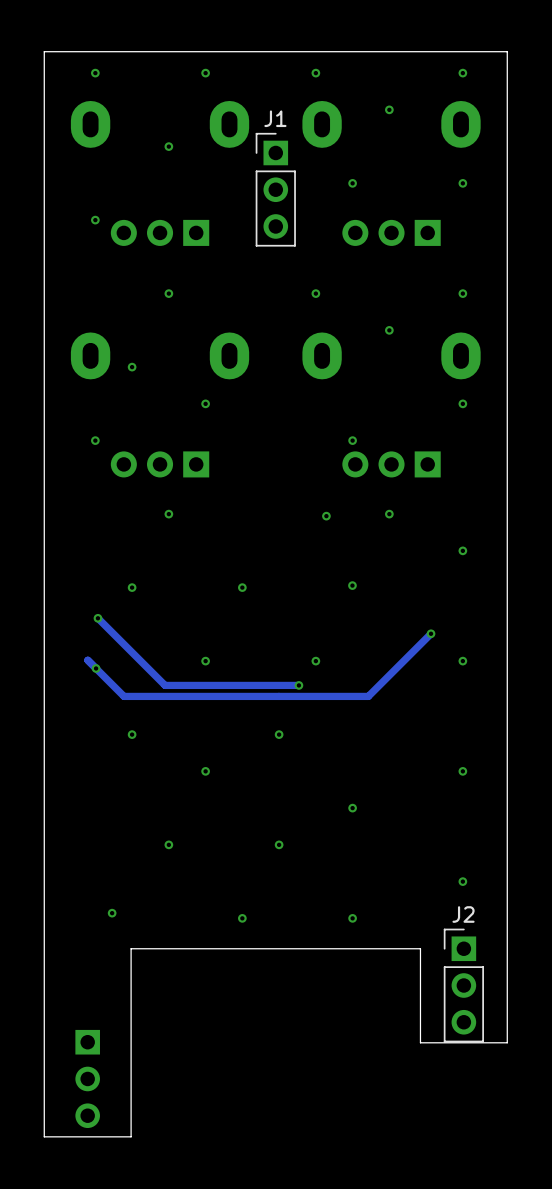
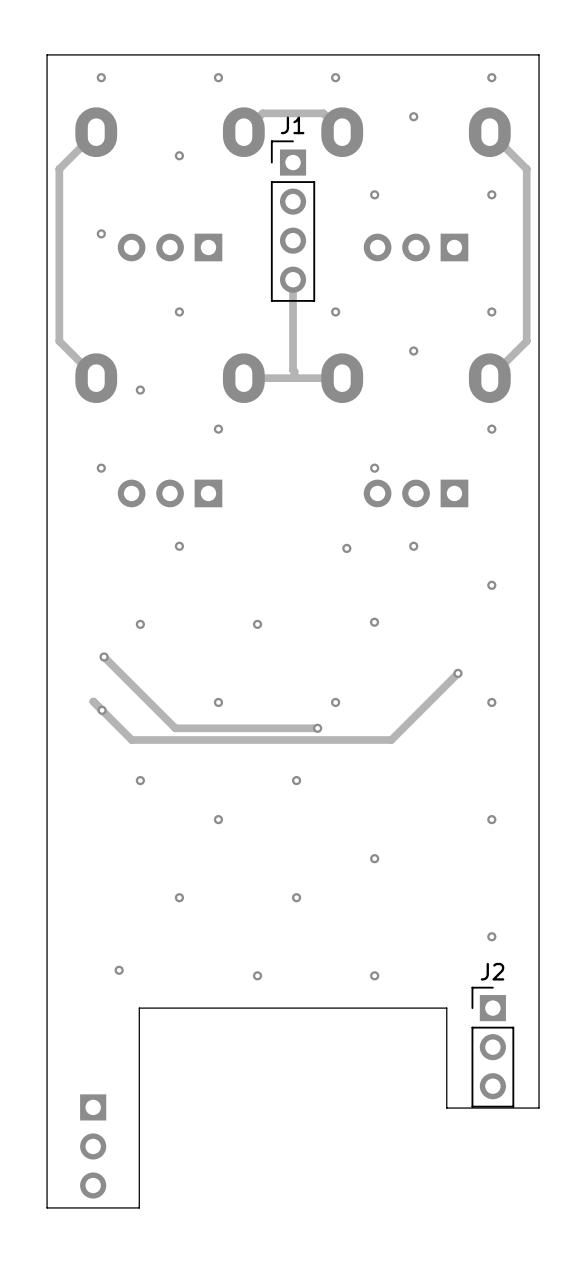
track: none -> (96, 132) (59, 169) (59, 341) (96, 378)
track: none -> (342, 132) (323, 113) (262, 113) (243, 132)
track: none -> (489, 132) (526, 169) (526, 341) (489, 378)
J1 footprint: [255, 132, 296, 247] -> [270, 140, 316, 302]
track: none -> (293, 279) (294, 378)
track: none -> (342, 378) (243, 378)

